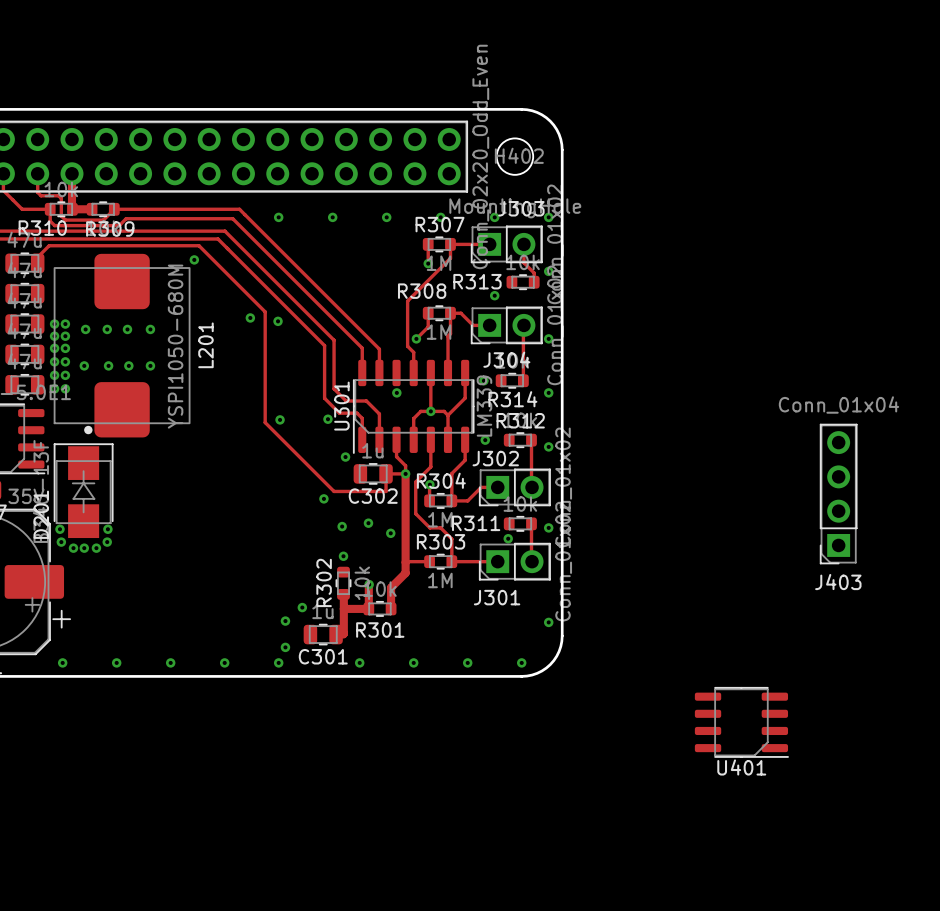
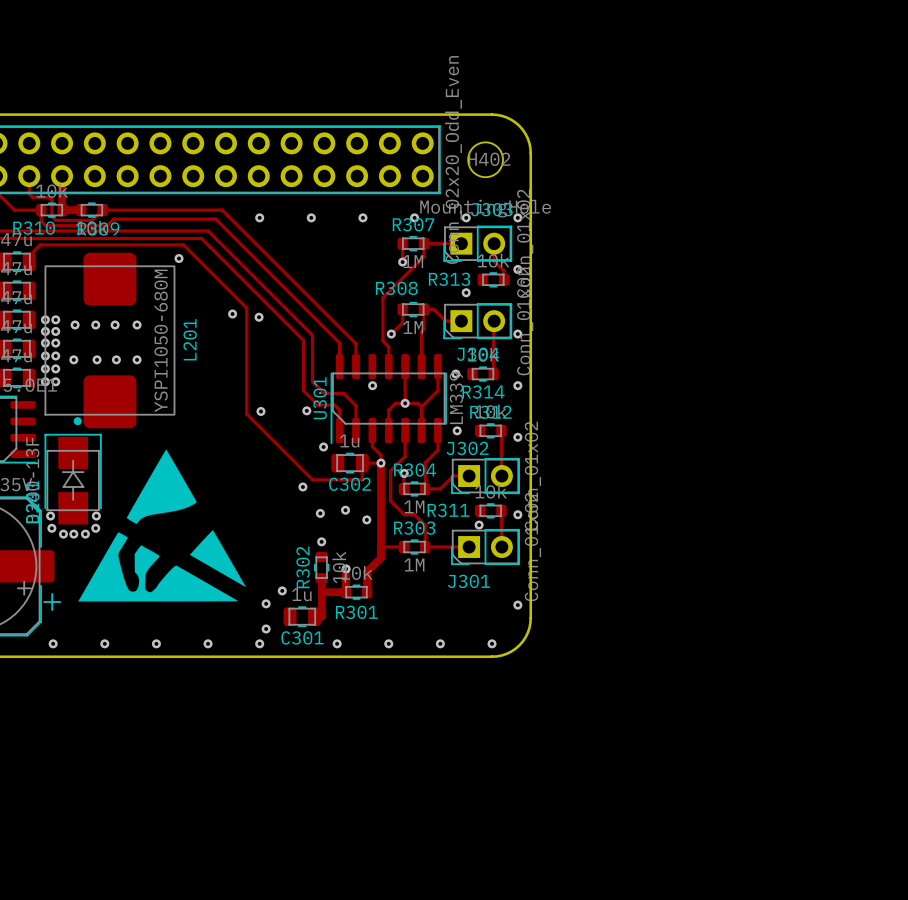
drawing: none -> [78, 449, 246, 602]
J403: Conn_01x04 (838, 494) -> none
U401: (741, 722) -> none

